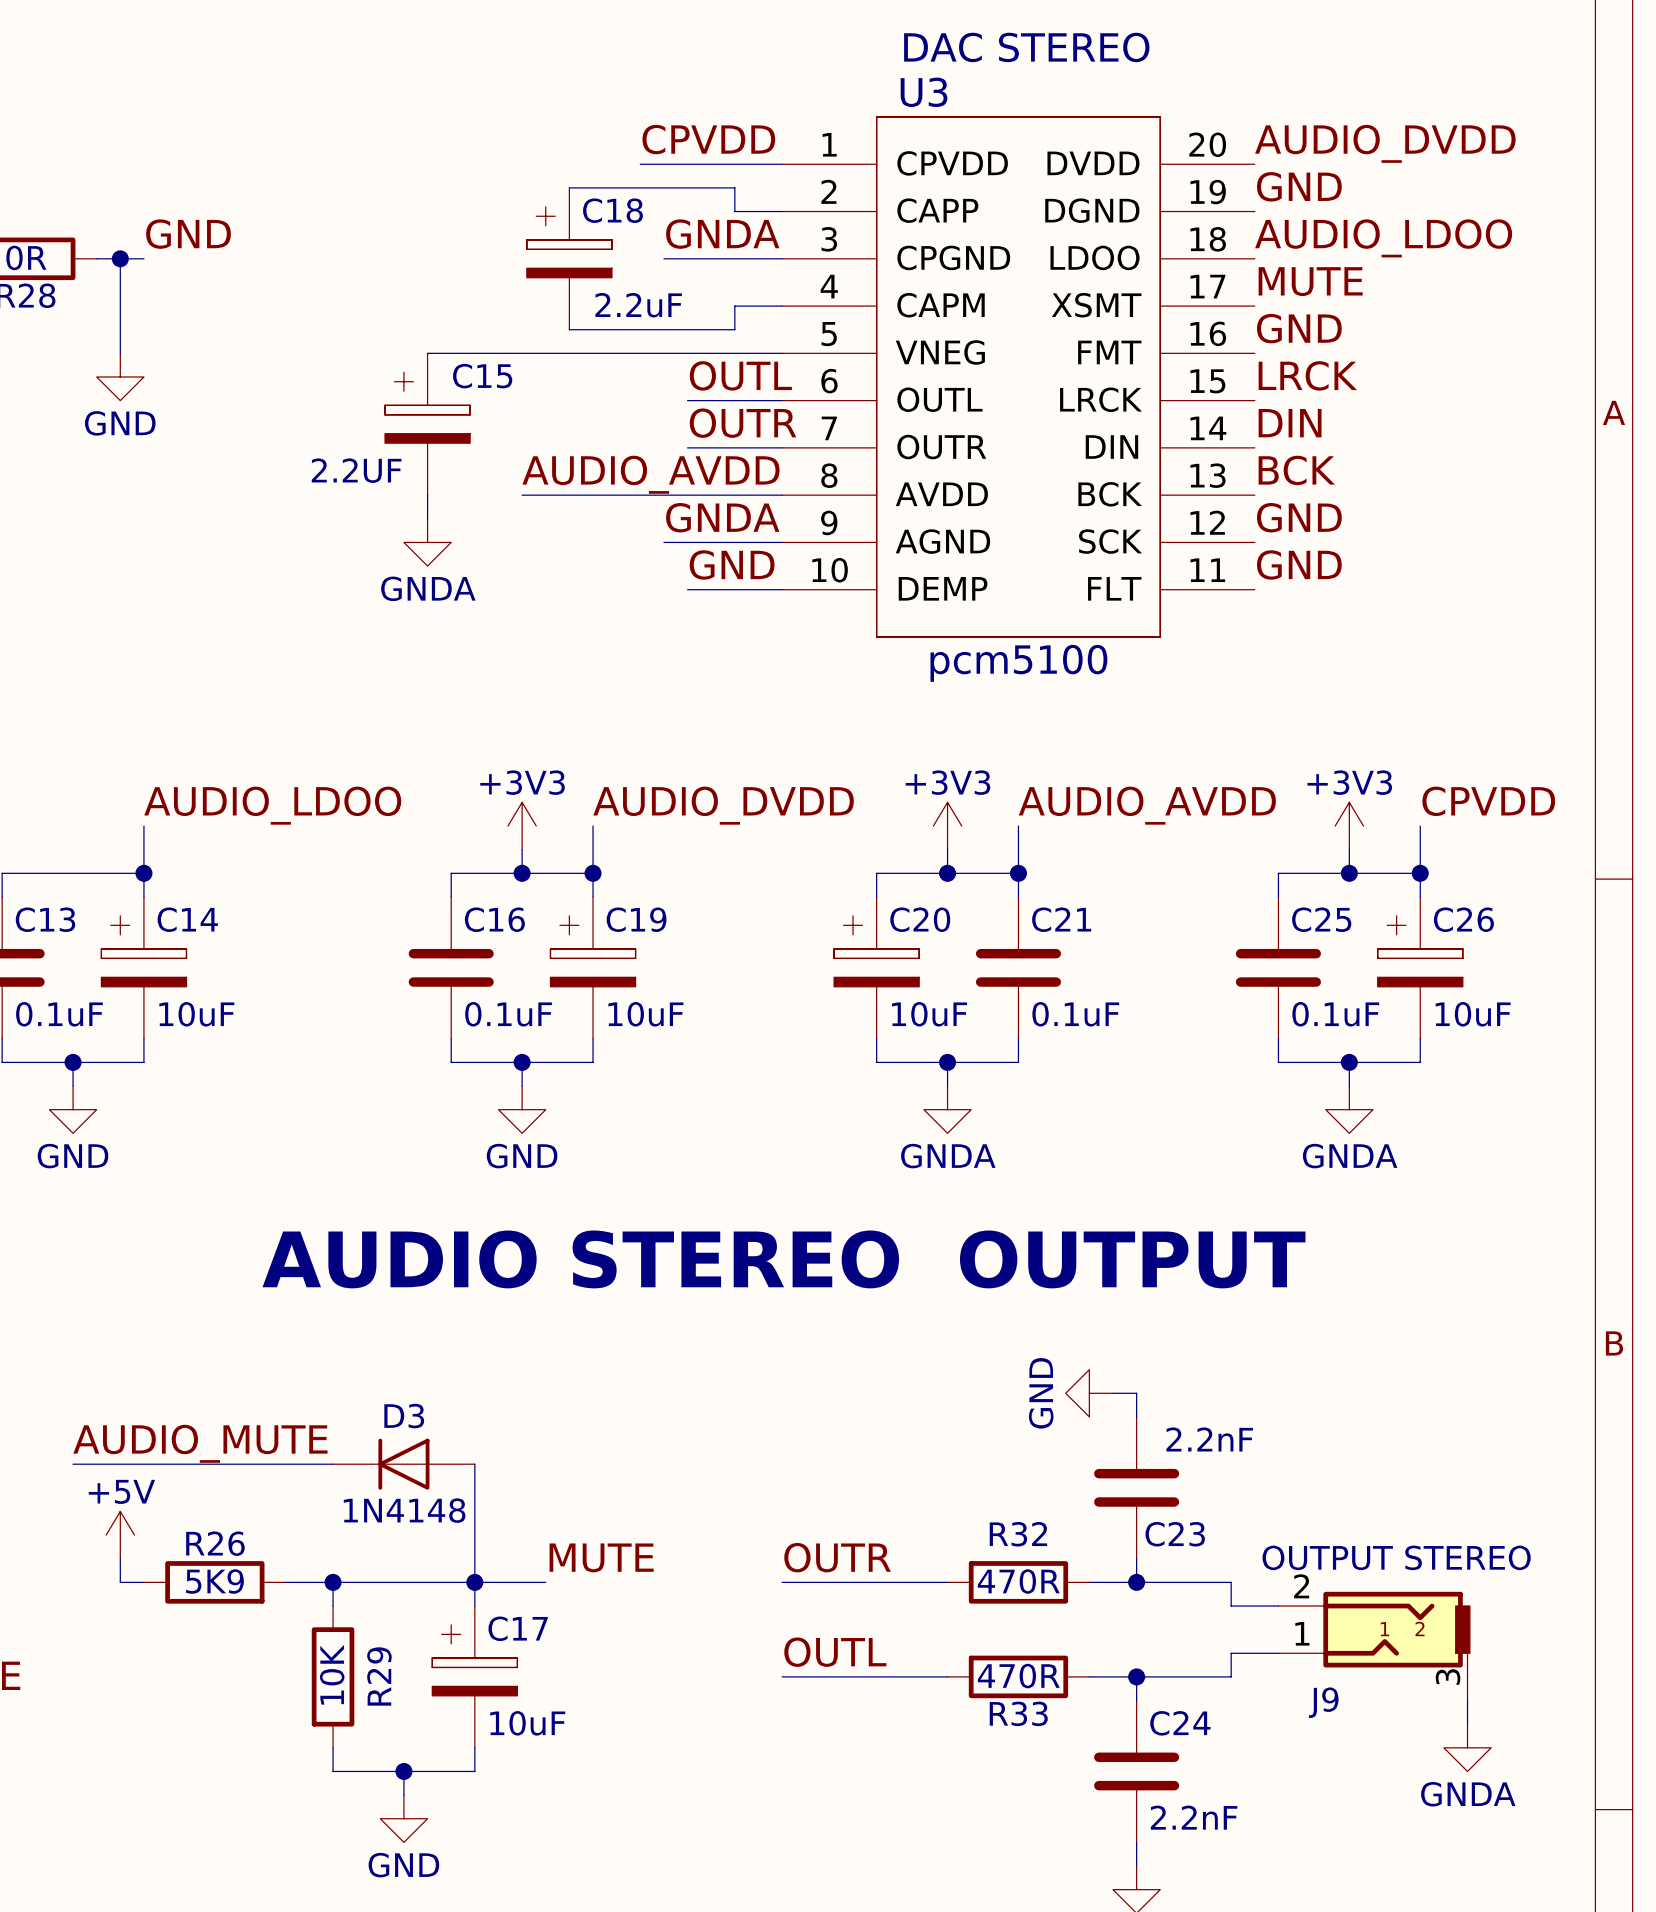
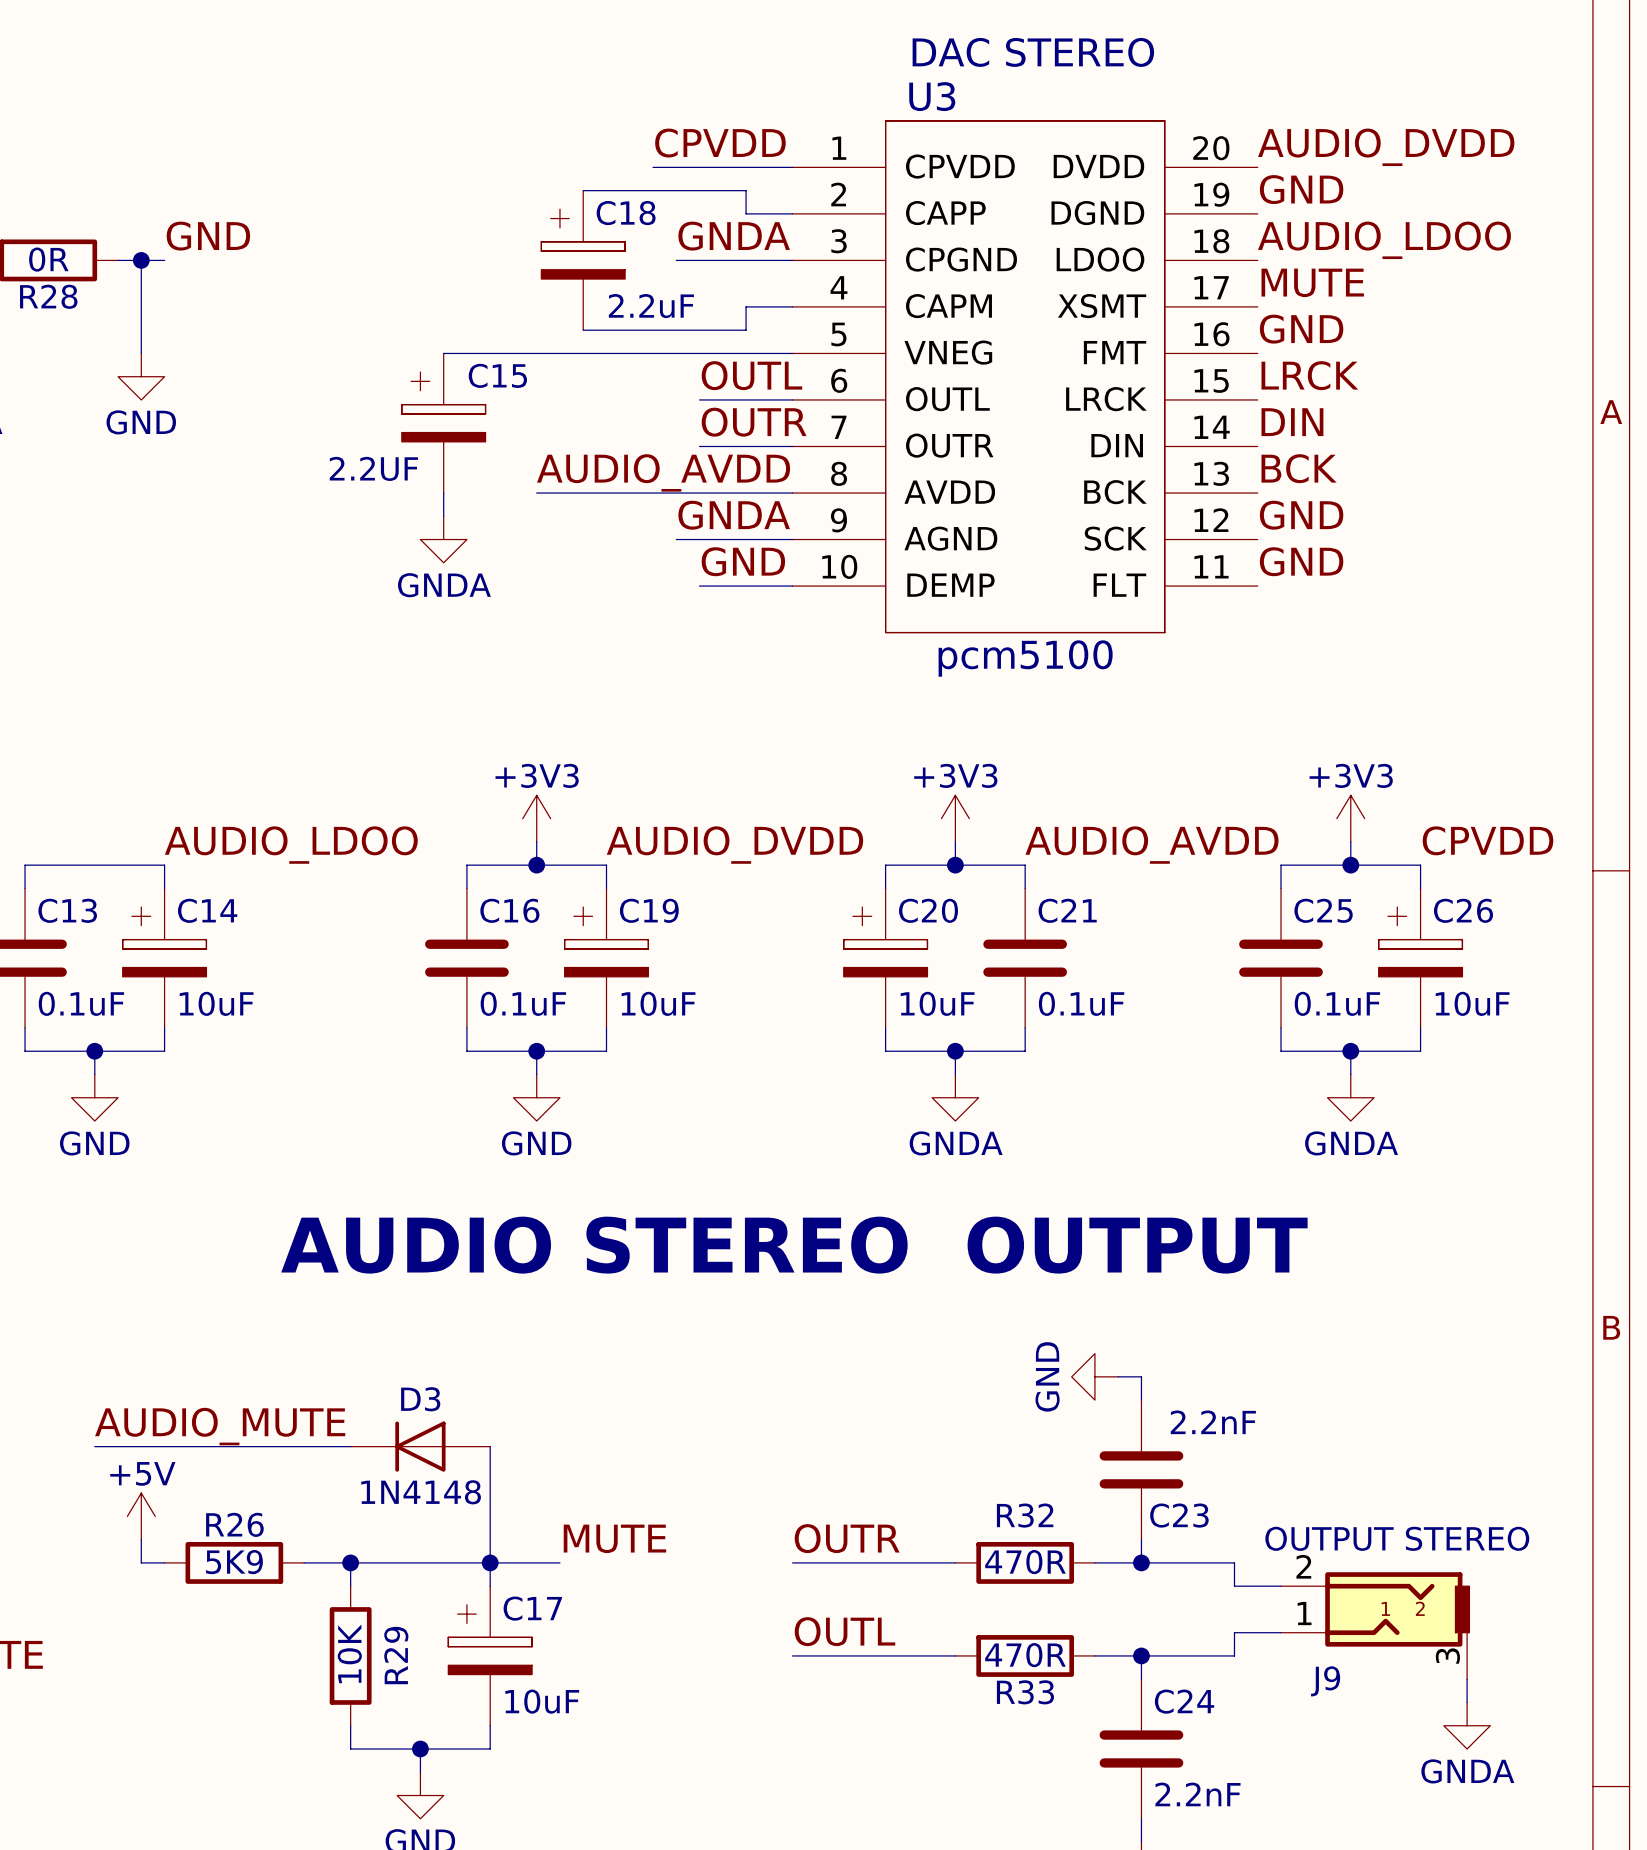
label position: CPVDD (1488, 801) -> CPVDD (1487, 840)
label position: AUDIO_LDOO (272, 805) -> AUDIO_LDOO (291, 845)
label position: AUDIO_DVDD (723, 805) -> AUDIO_DVDD (734, 845)
label position: AUDIO_AVDD (1147, 805) -> AUDIO_AVDD (1151, 845)
wire: (143, 826) (143, 873) -> none
wire: (593, 826) (593, 873) -> none
wire: (1018, 826) (1018, 873) -> none
wire: (1420, 826) (1420, 873) -> none
junction: (143, 873) -> none
junction: (593, 873) -> none
junction: (1018, 873) -> none
junction: (1420, 873) -> none

